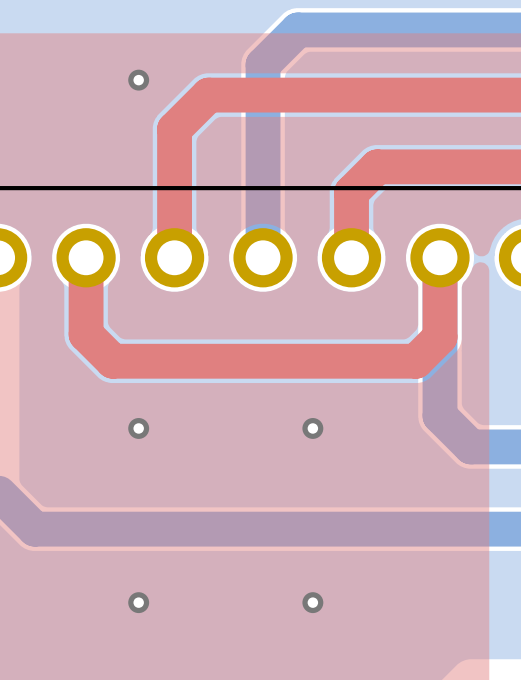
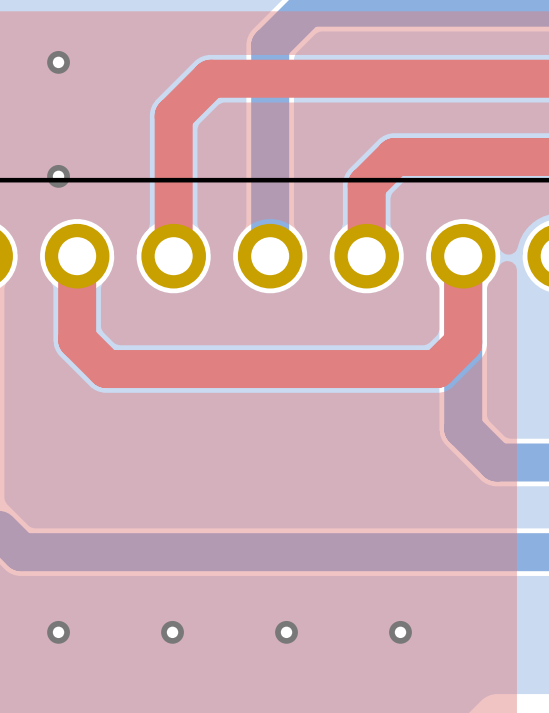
via: none -> (58, 62)
via: (138, 80) -> none
via: none -> (58, 176)
via: (138, 428) -> none
via: (312, 428) -> none
via: none -> (58, 632)
via: (138, 602) -> none
via: none -> (172, 632)
via: none -> (286, 632)
via: (312, 602) -> none
via: none -> (400, 632)

